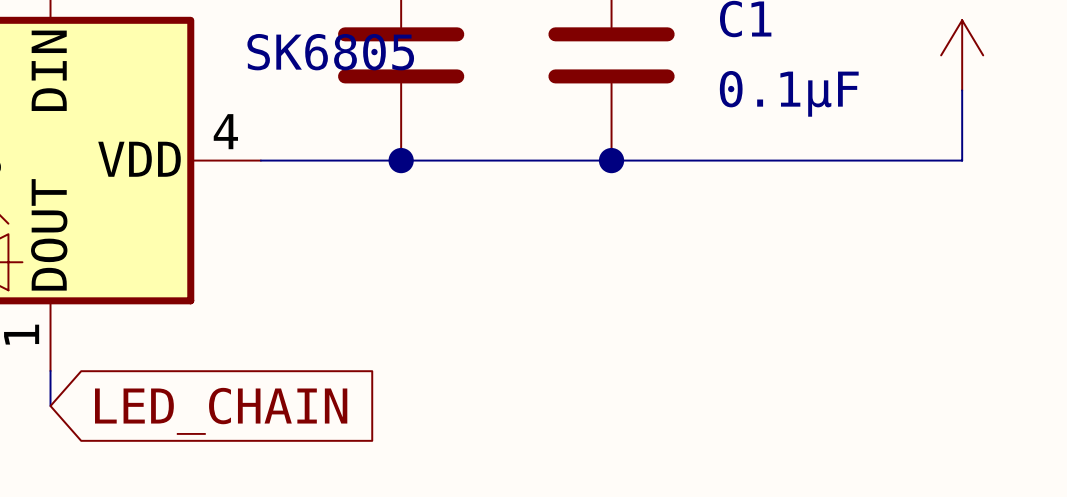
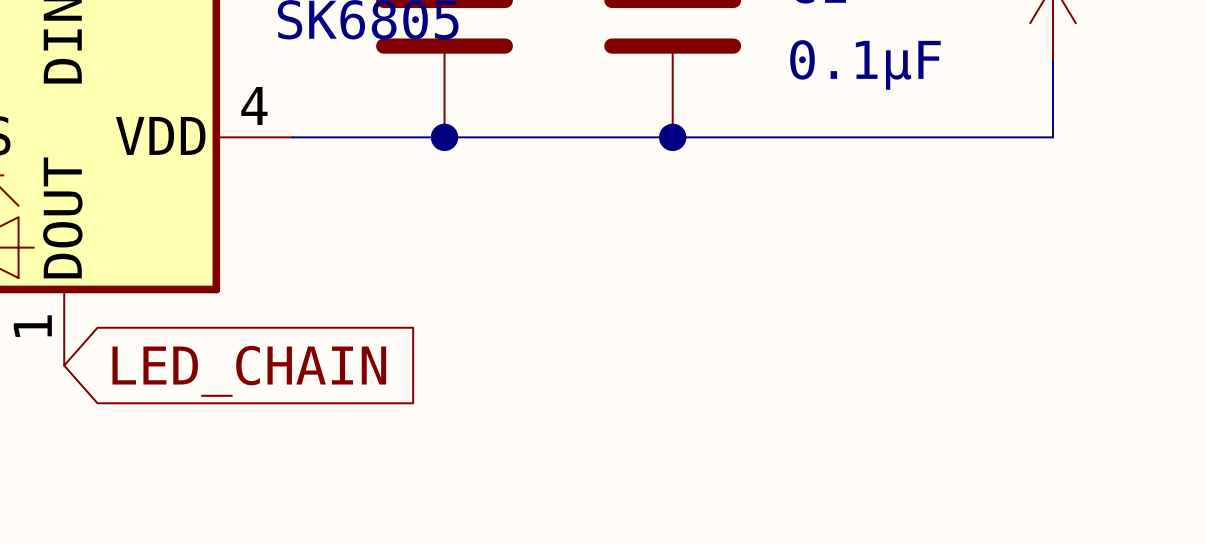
wire: (50, 370) (50, 406) -> none
global label position: LED_CHAIN (221, 411) -> LED_CHAIN (249, 371)

